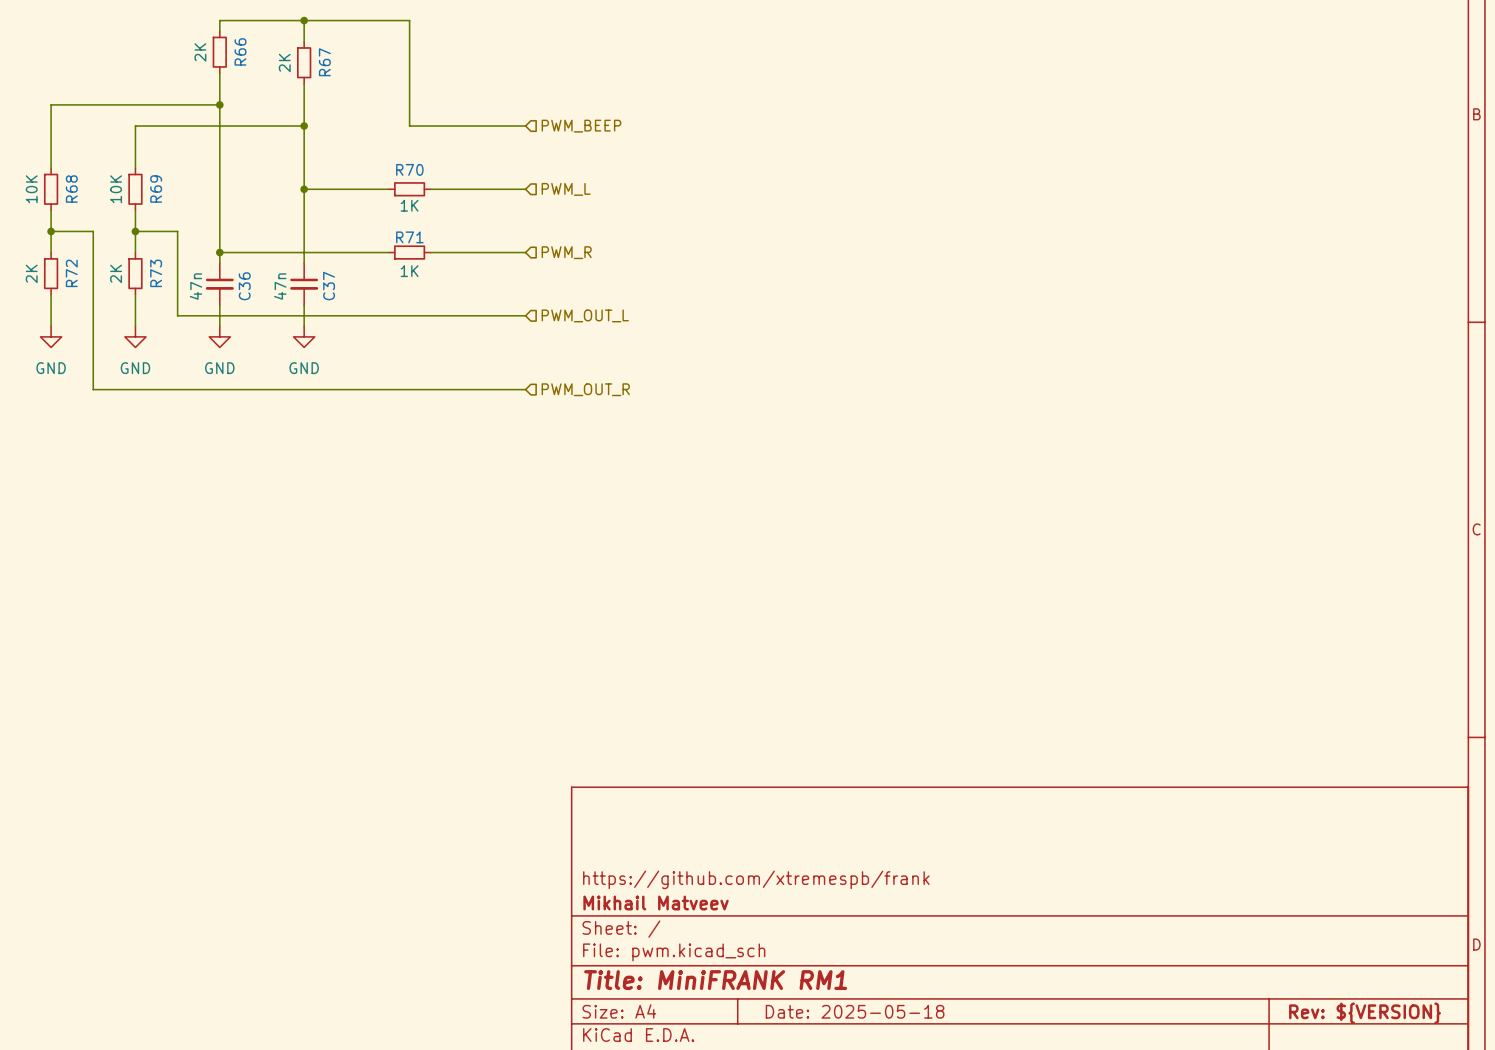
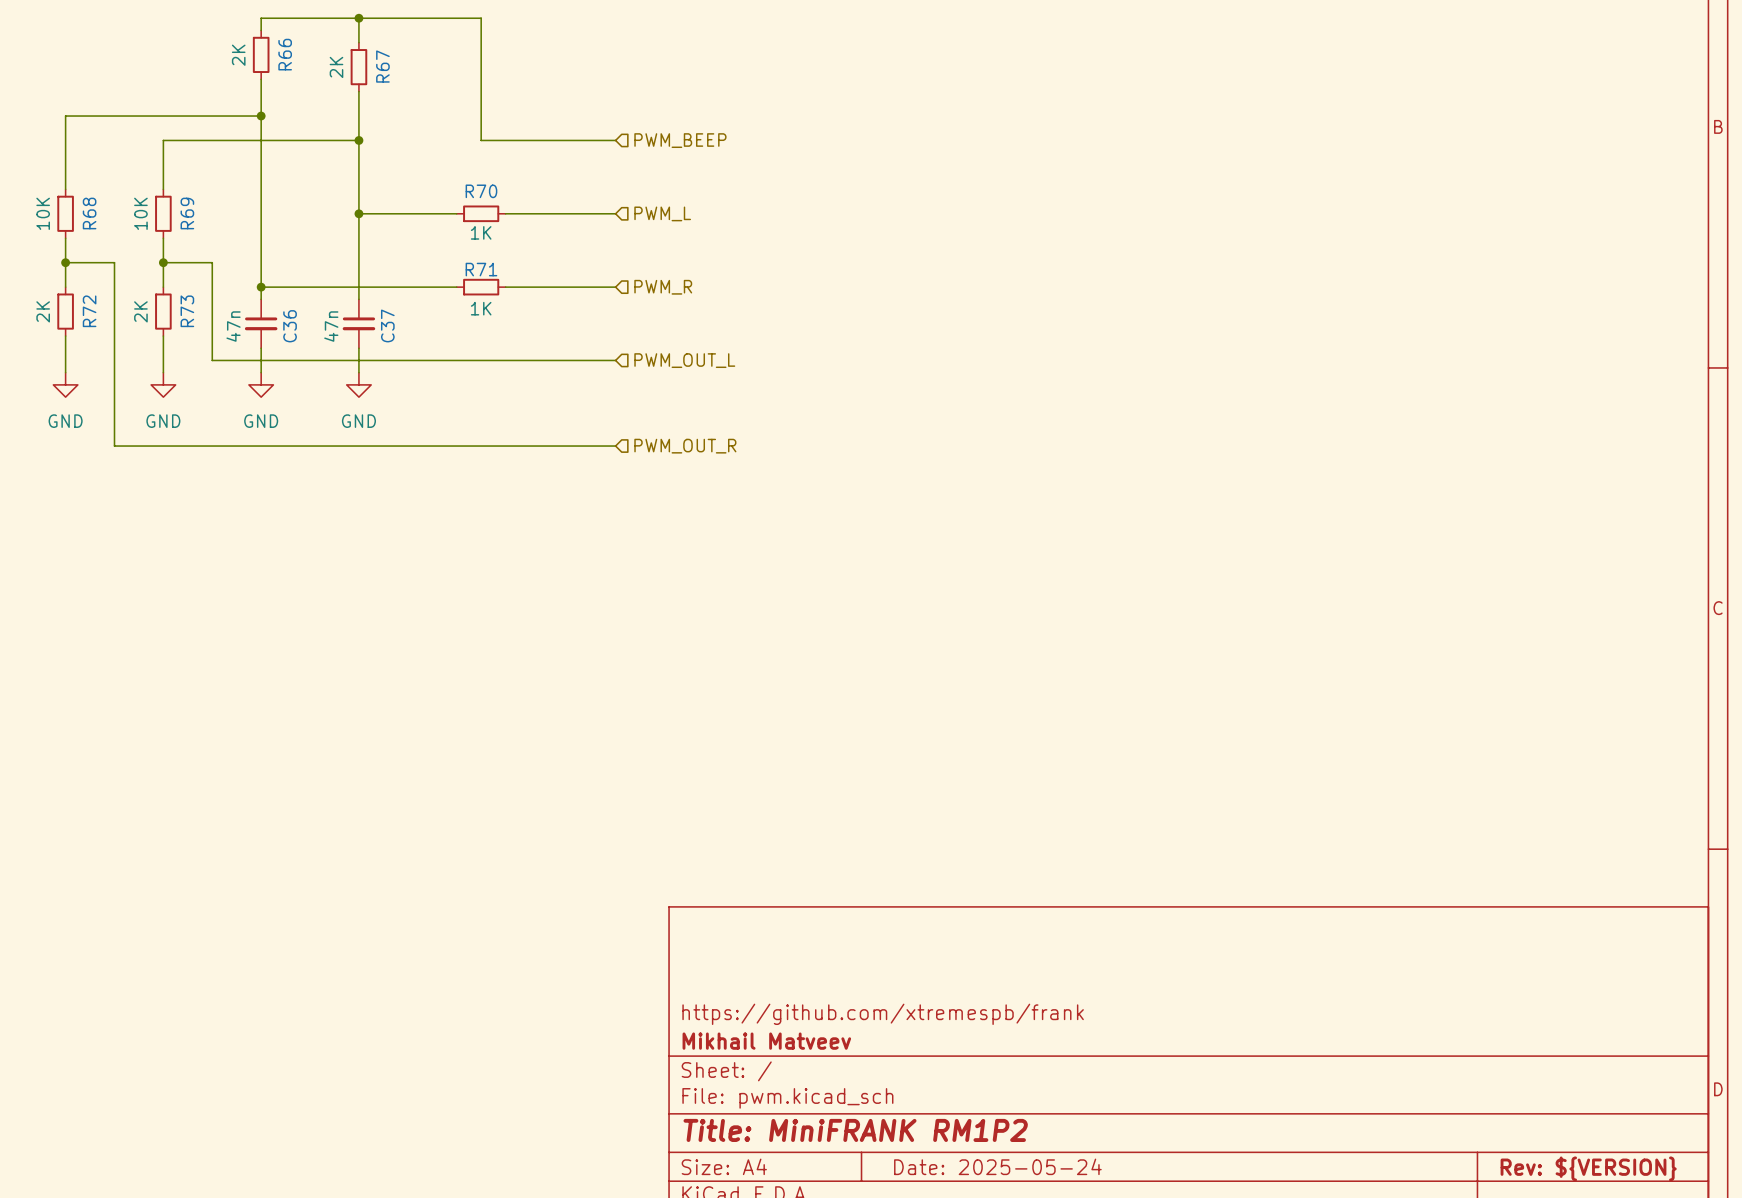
title block: Title: MiniFRANK RM1 (715, 980) -> Title: MiniFRANK RM1P2 (855, 1130)
title block: Date: 2025-05-18 (855, 1011) -> Date: 2025-05-24 (997, 1166)

